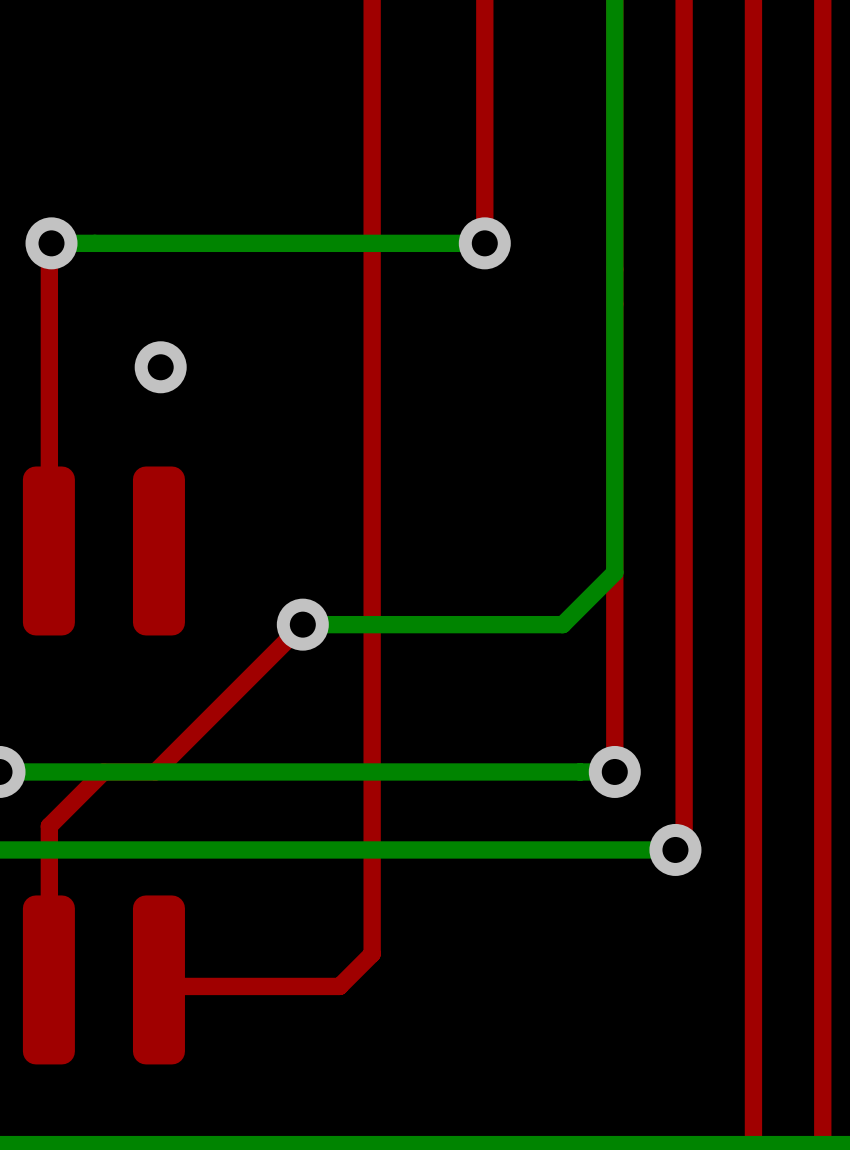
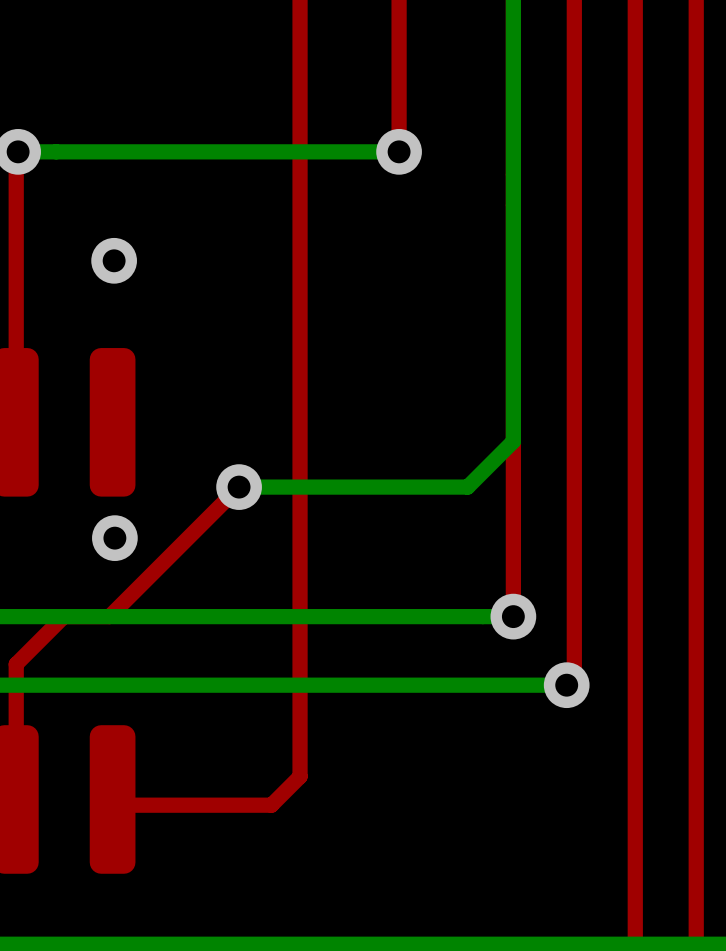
via: none -> (114, 538)

